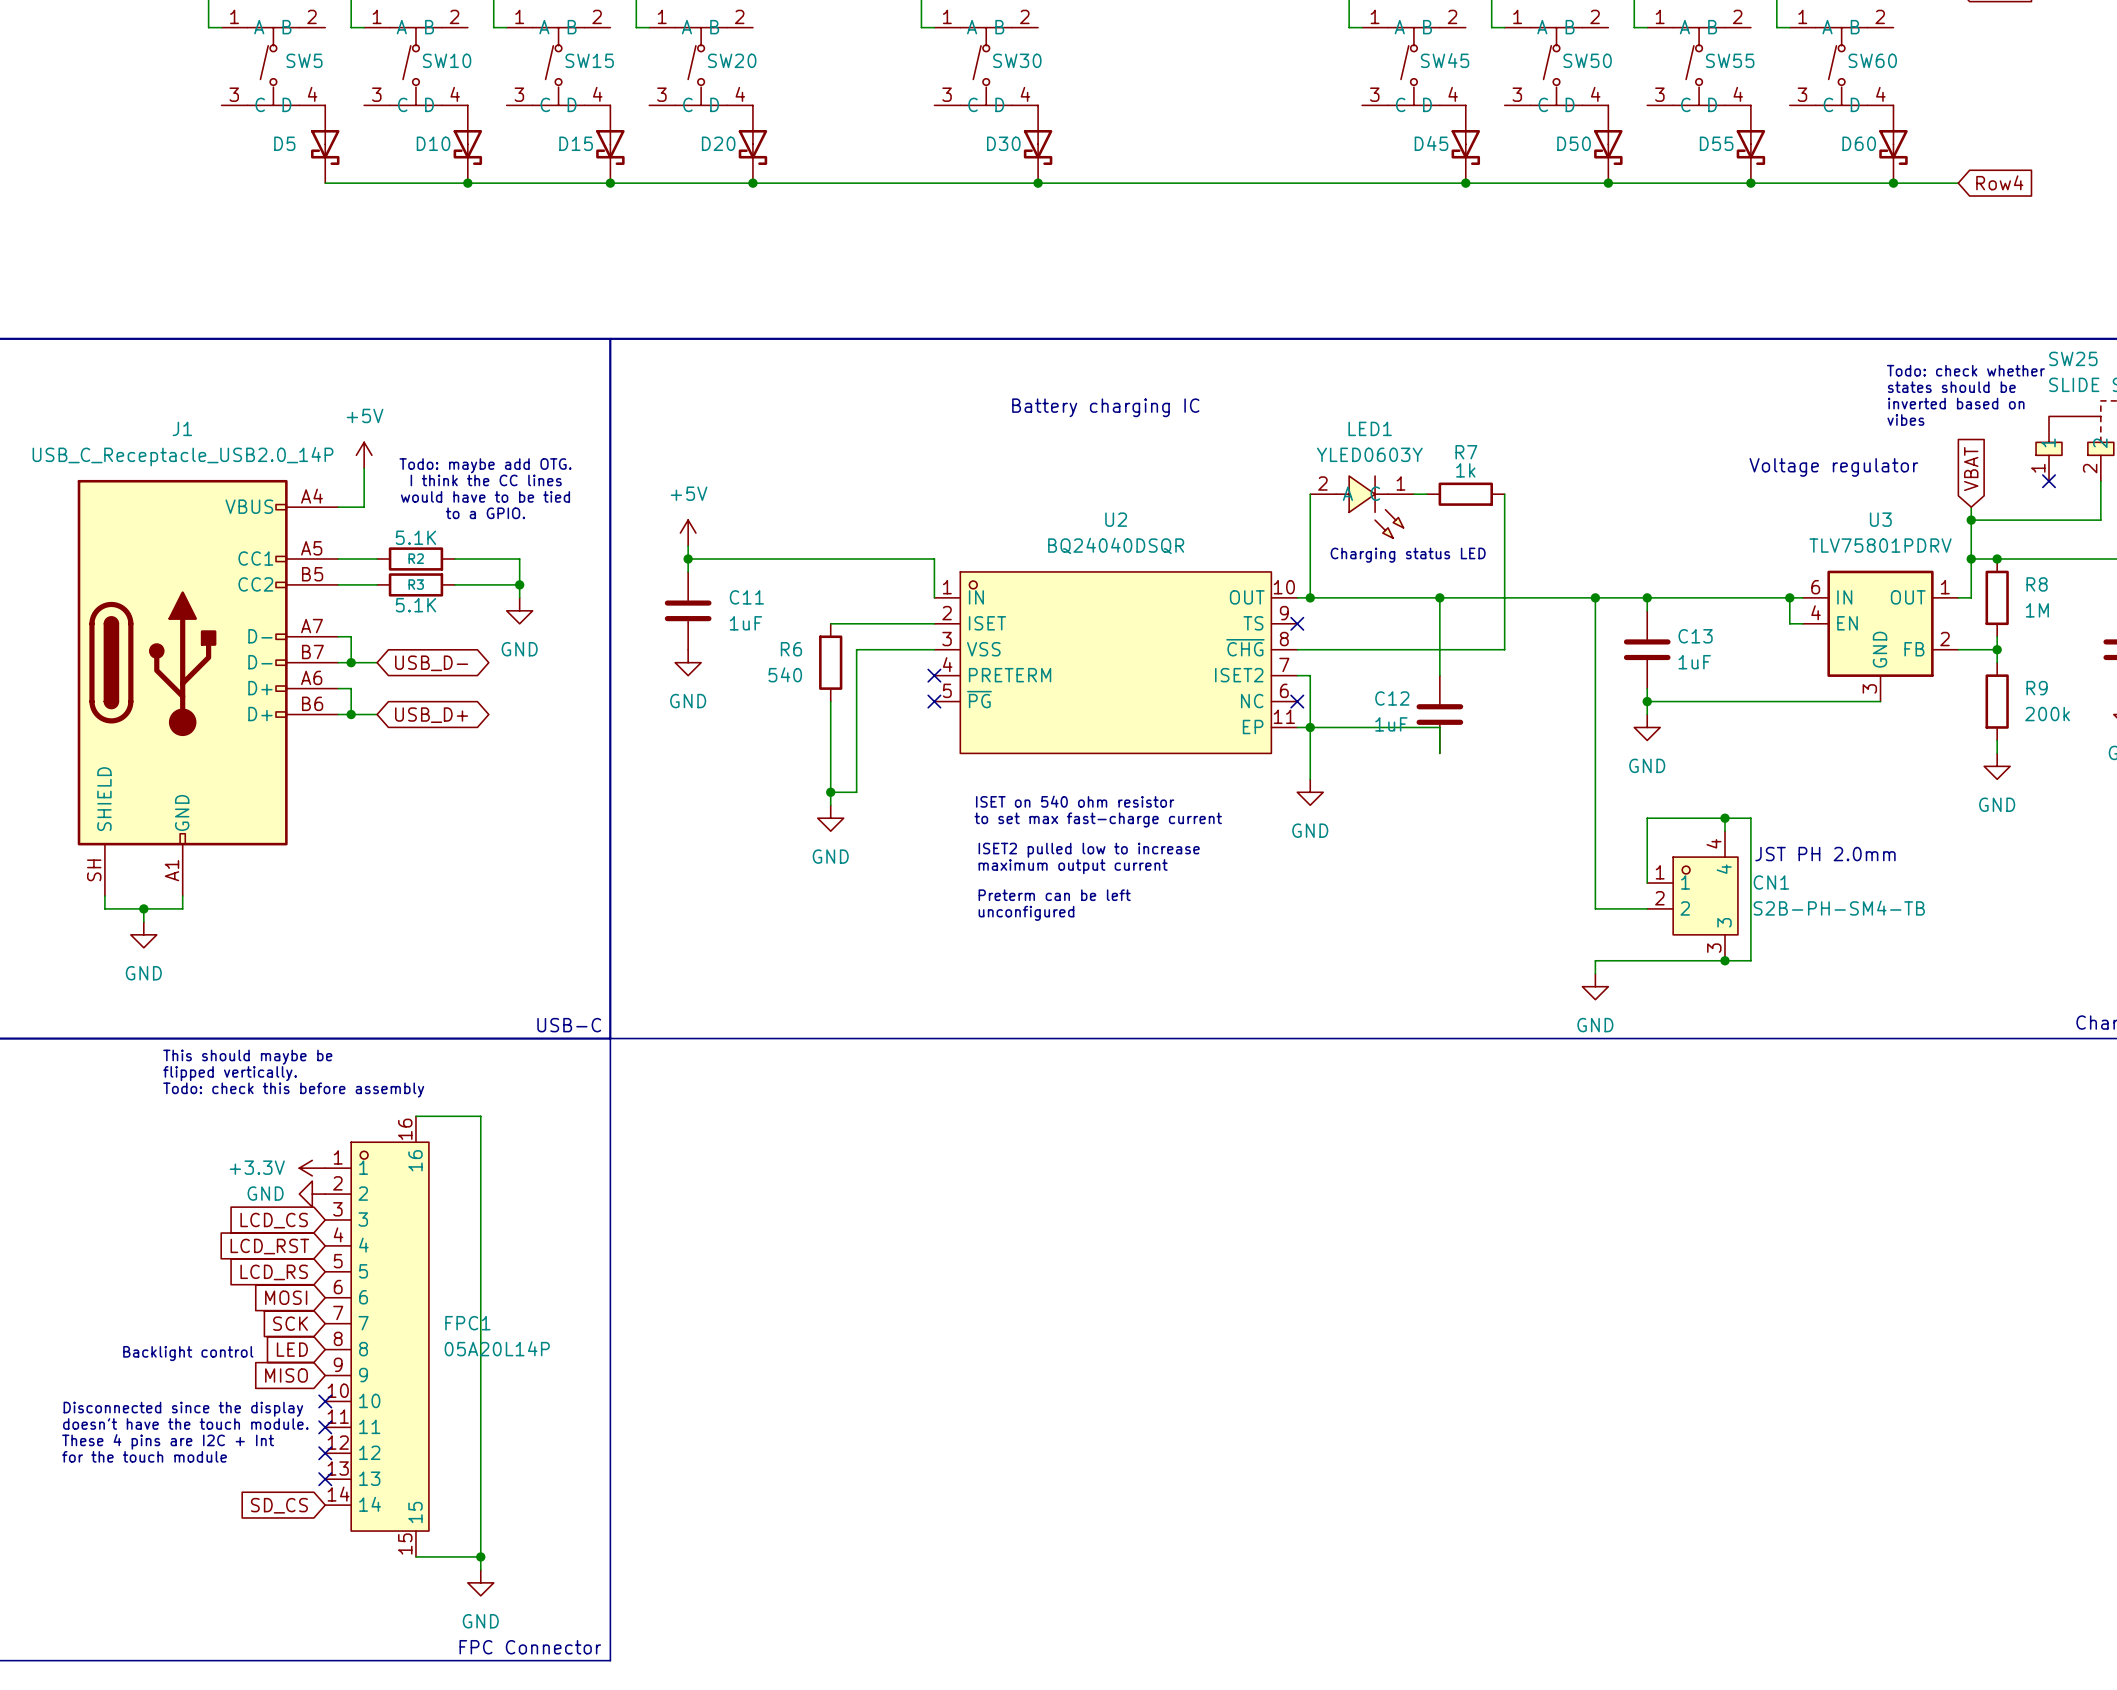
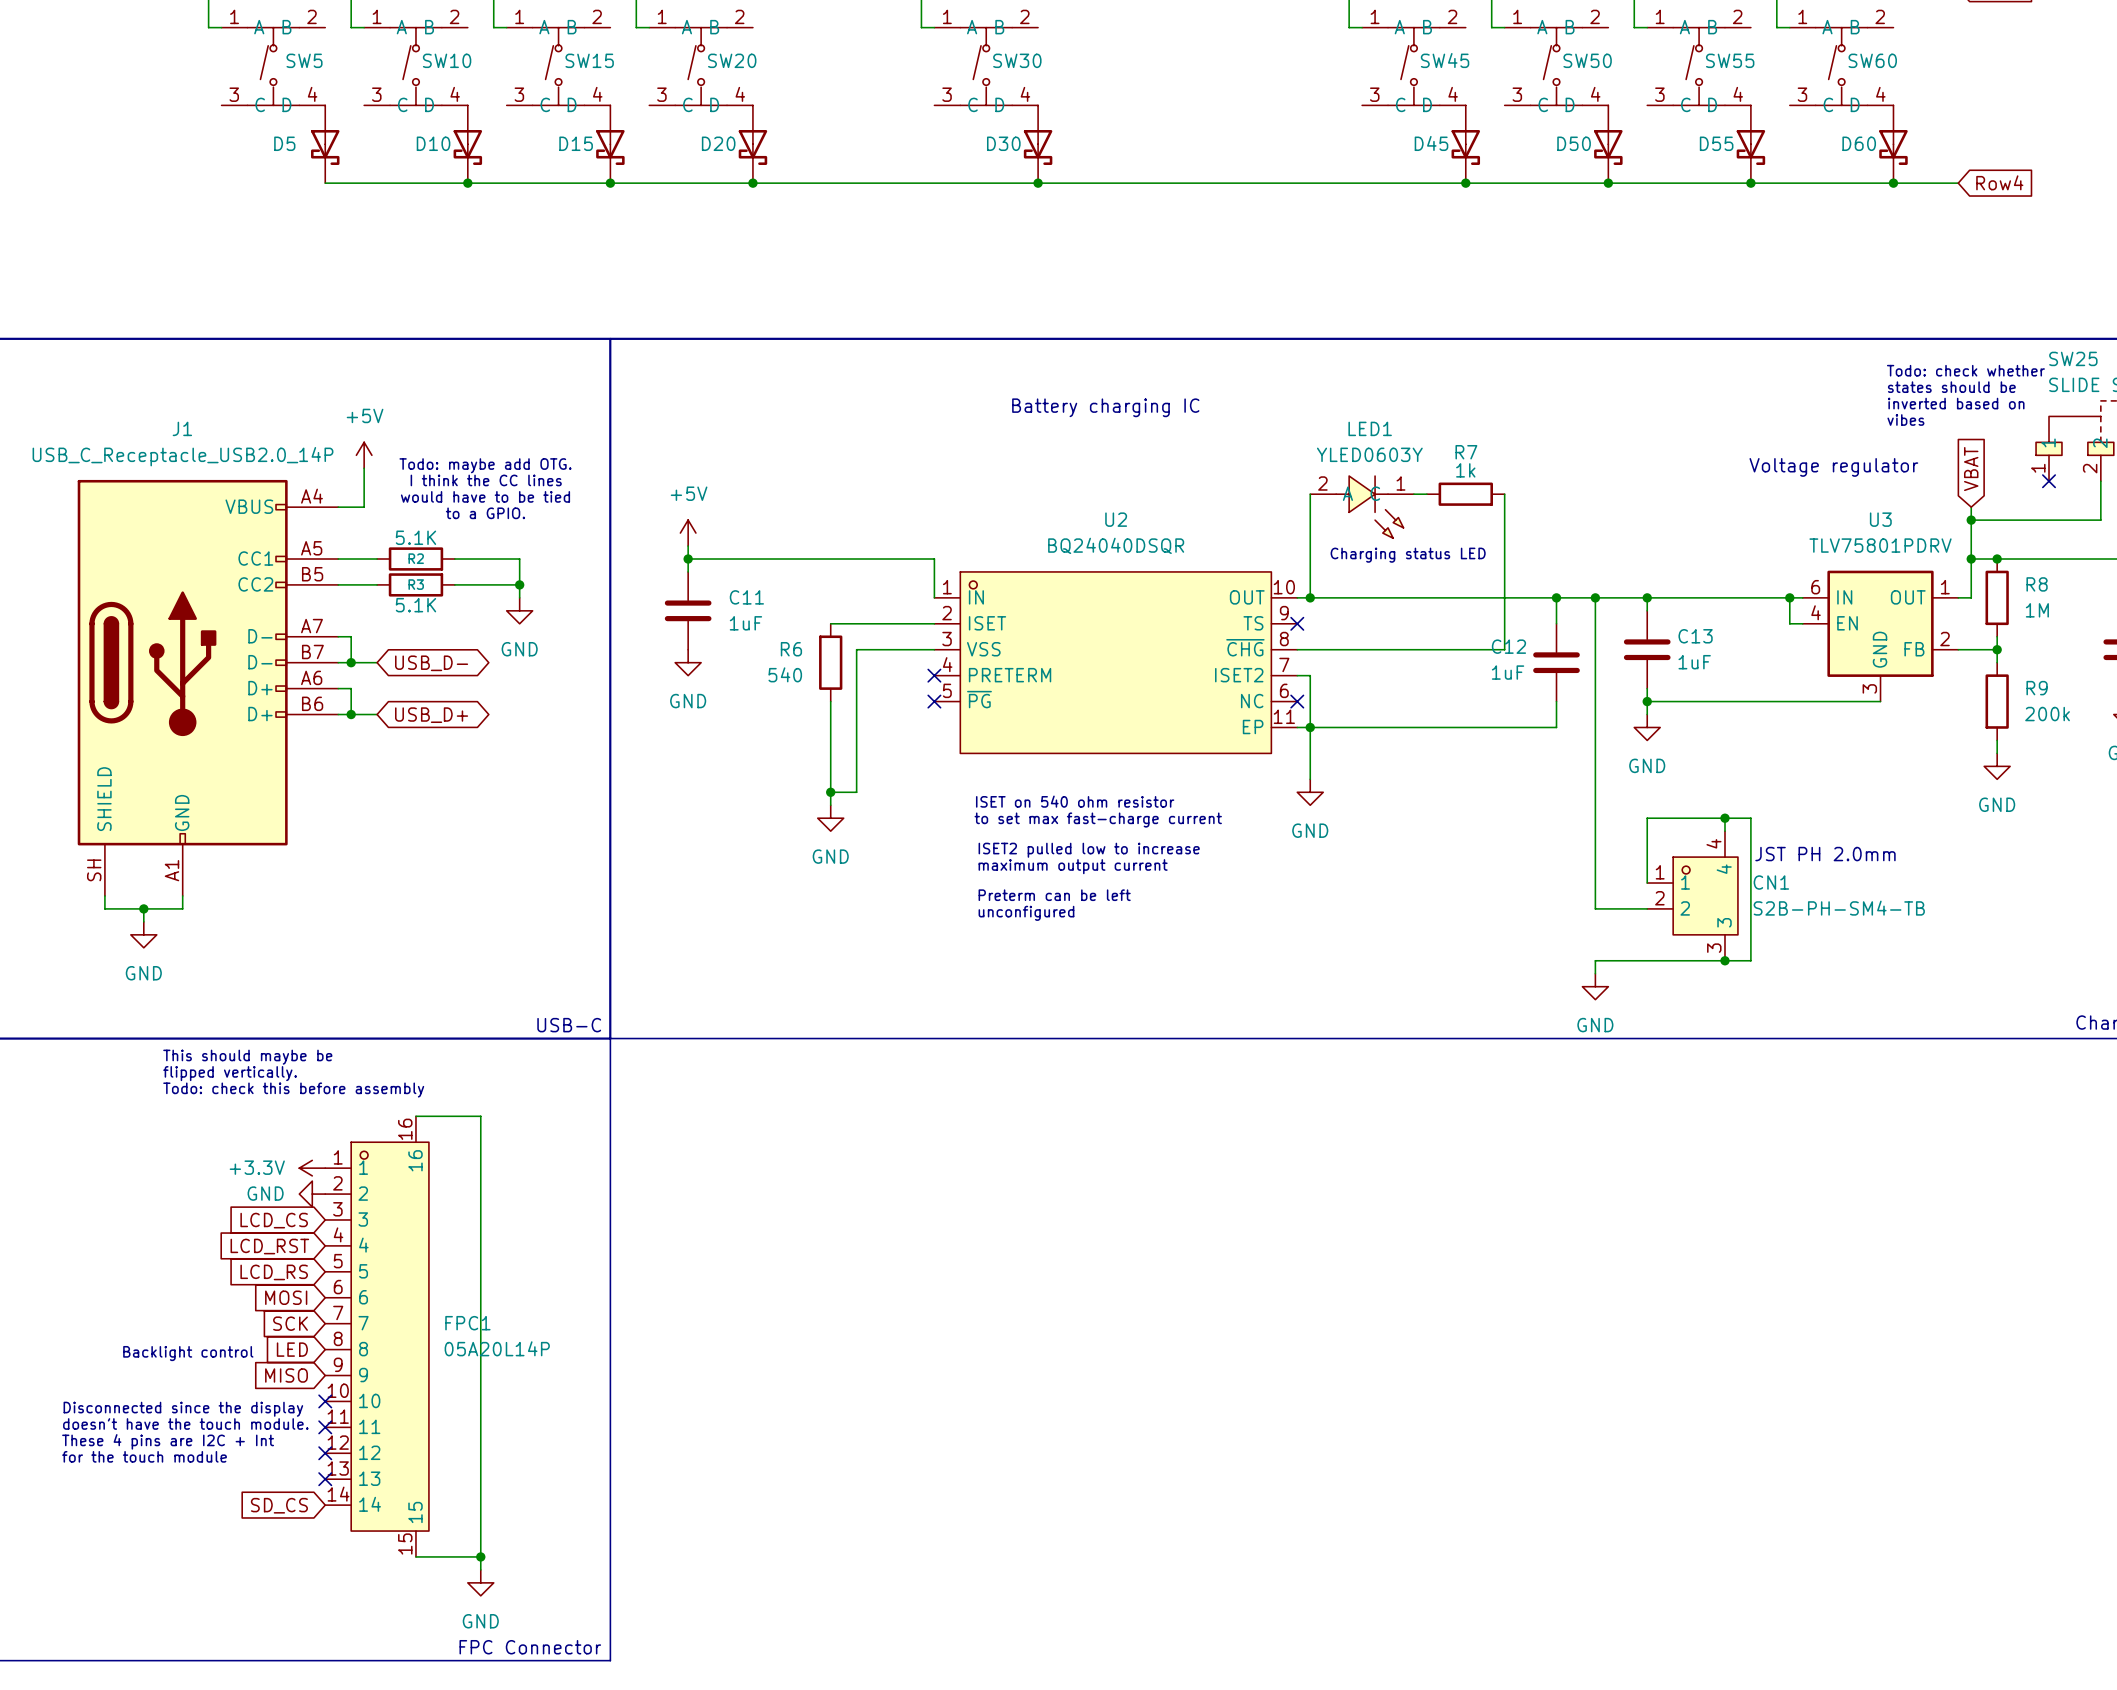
wire: (1439, 597) (1439, 675) -> none
junction: (1439, 597) -> none
wire: none -> (1556, 597) (1556, 623)
junction: none -> (1556, 597)
C12 position: (1439, 714) -> (1556, 662)
wire: (1439, 727) (1439, 753) -> (1439, 727) (1556, 727) (1556, 701)

